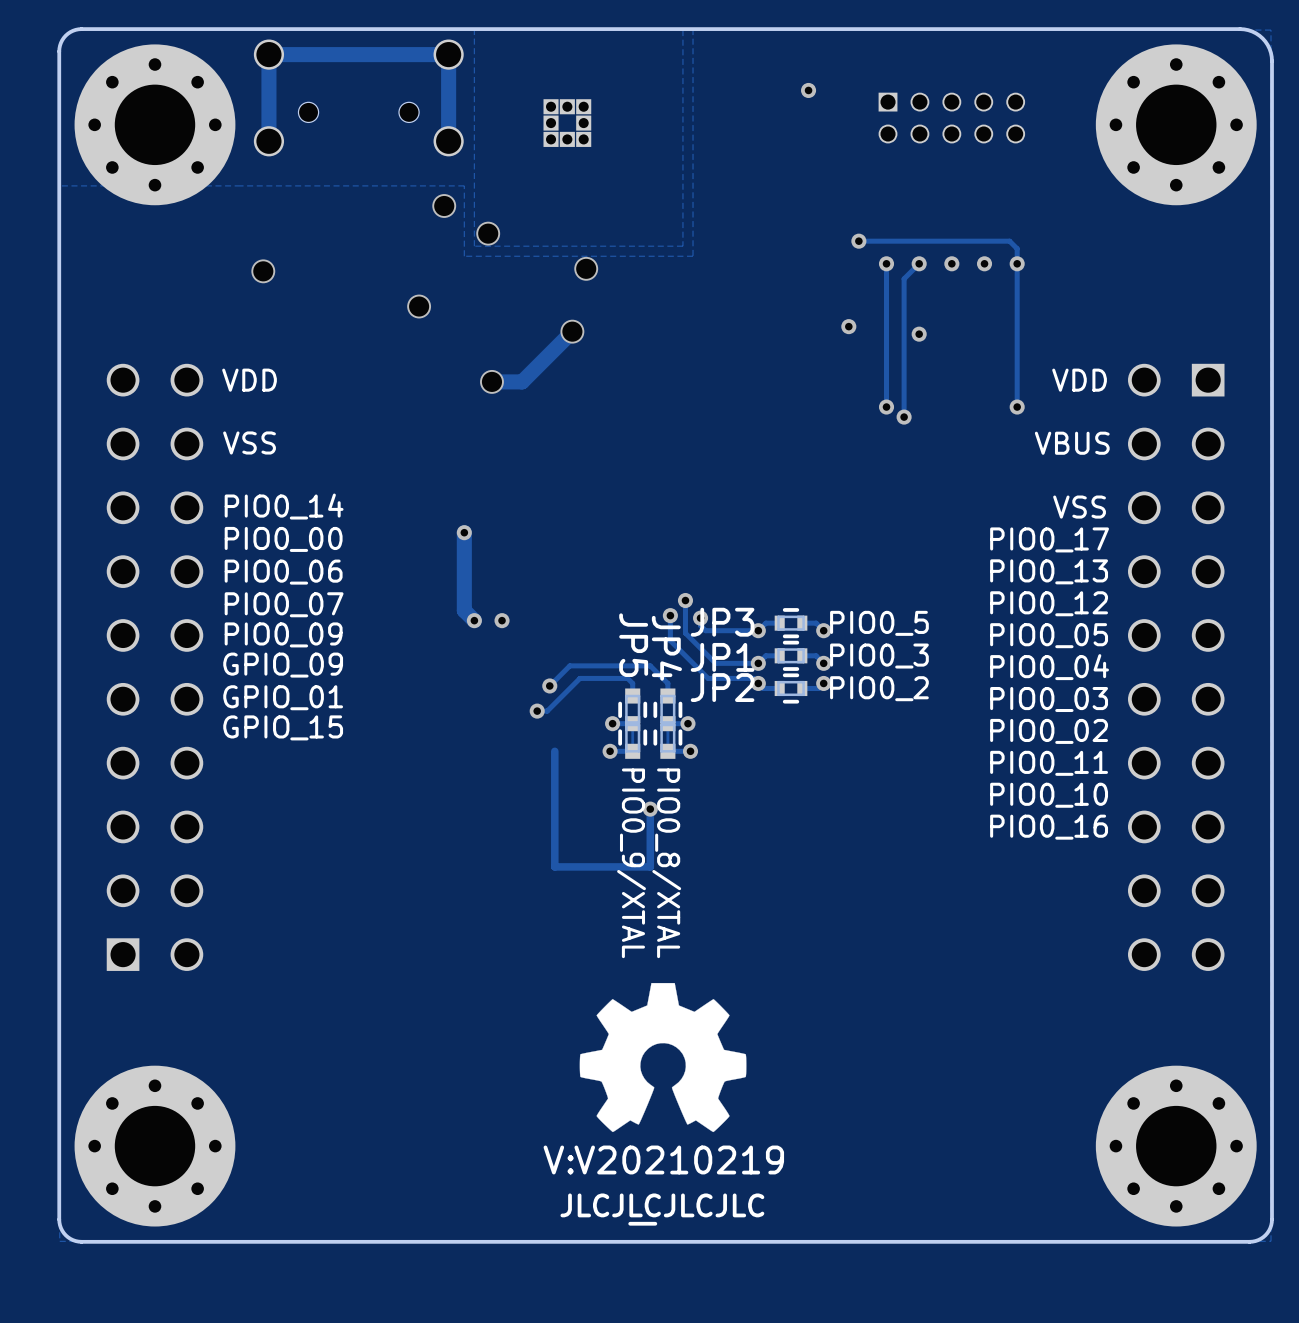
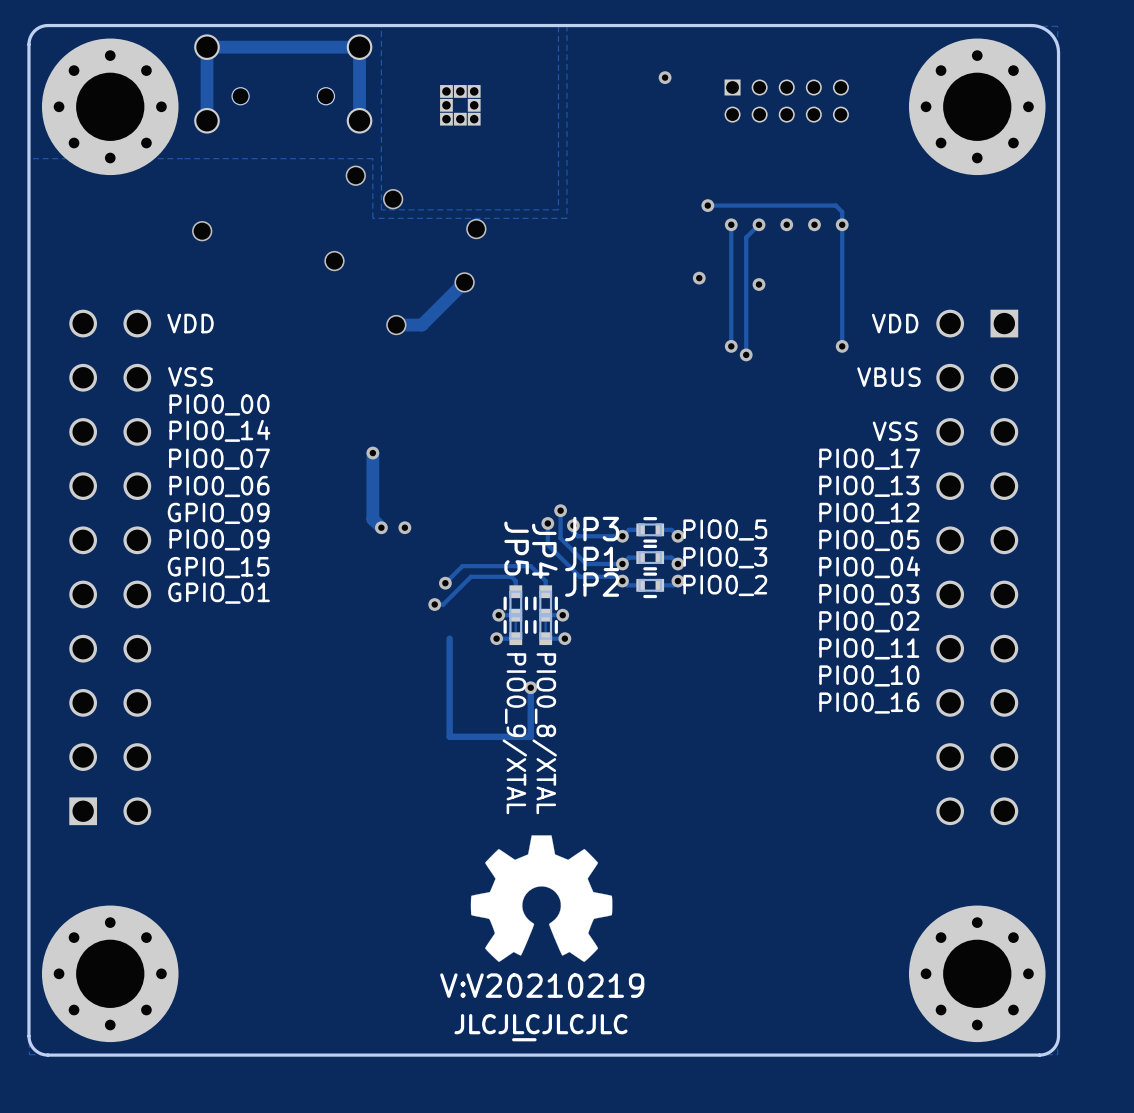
part text position: PIO0_00 (283, 539) -> PIO0_00 (219, 405)
part text position: PIO0_07 (284, 604) -> PIO0_07 (219, 459)
part text position: GPIO_09 (283, 665) -> GPIO_09 (218, 513)
part text position: GPIO_15 (283, 727) -> GPIO_15 (218, 567)

